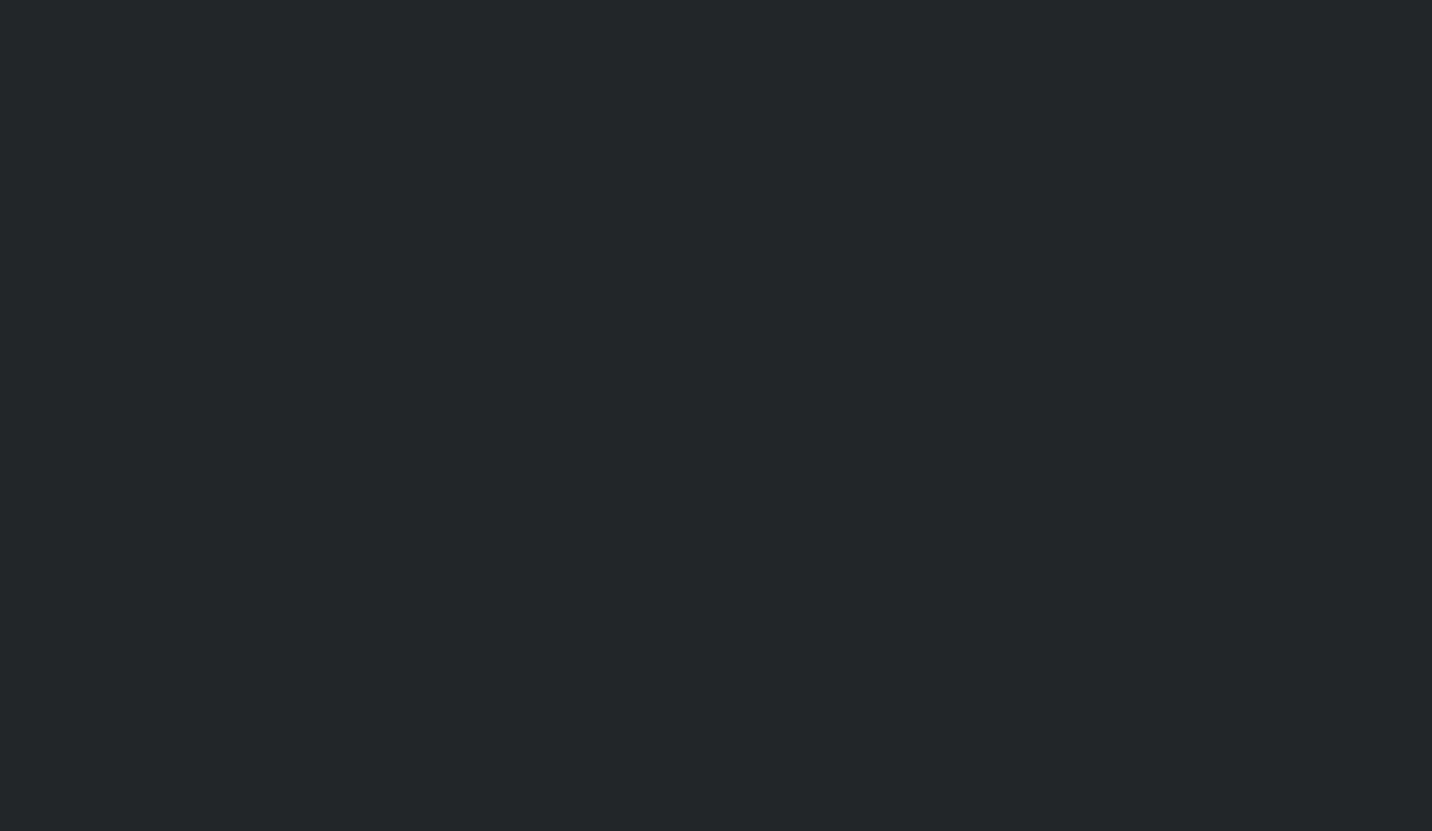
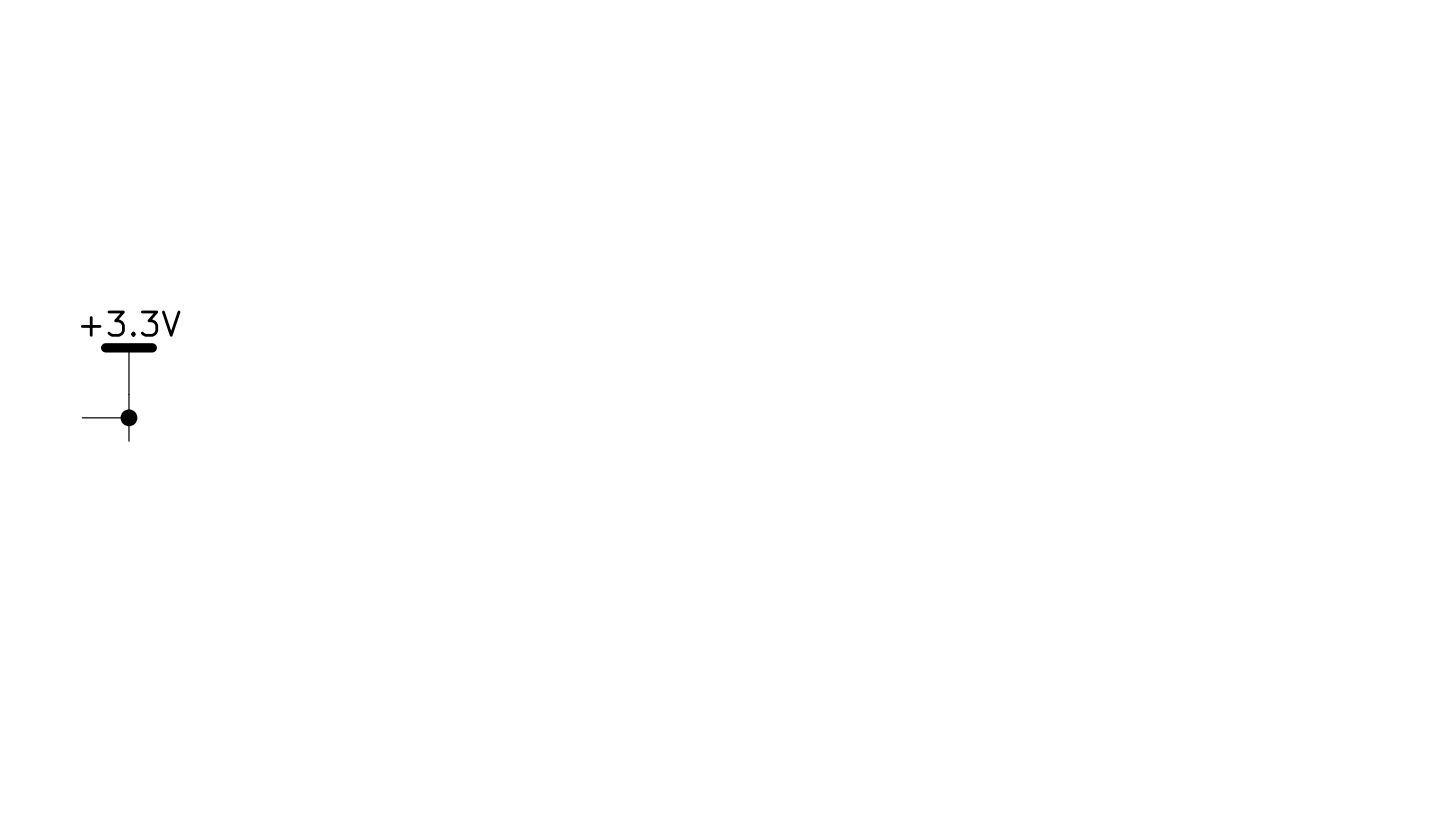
power symbol: none -> +3.3V (128, 368)
wire: none -> (128, 394) (128, 441)
wire: none -> (82, 417) (128, 417)
junction: none -> (128, 417)

